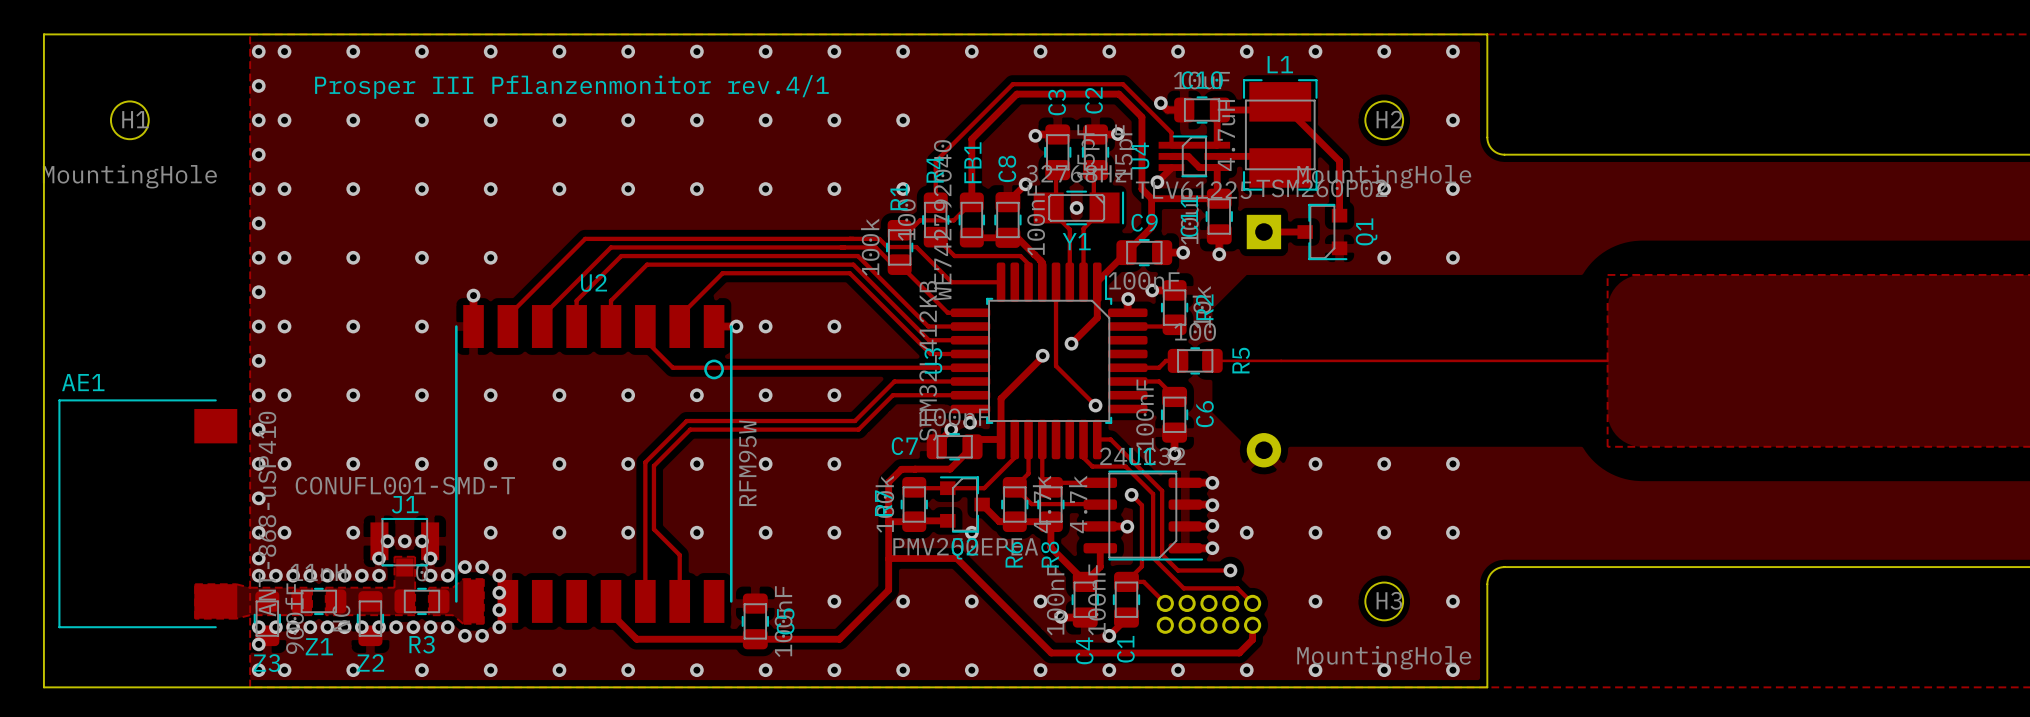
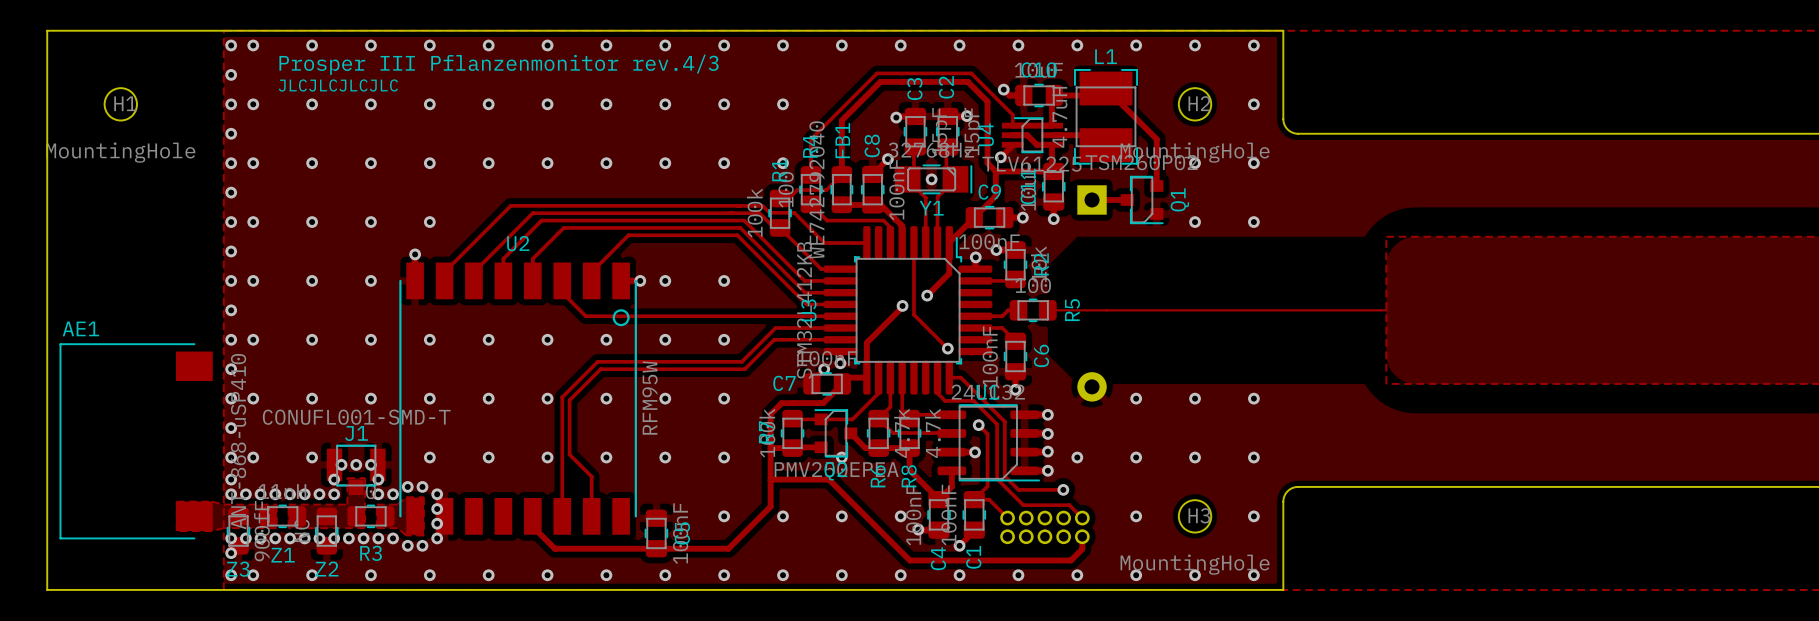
text: Prosper III Pflanzenmonitor rev.4/1 (571, 87) -> Prosper III Pflanzenmonitor rev.4/3 (499, 64)
text: none -> JLCJLCJLCJLC (338, 85)

